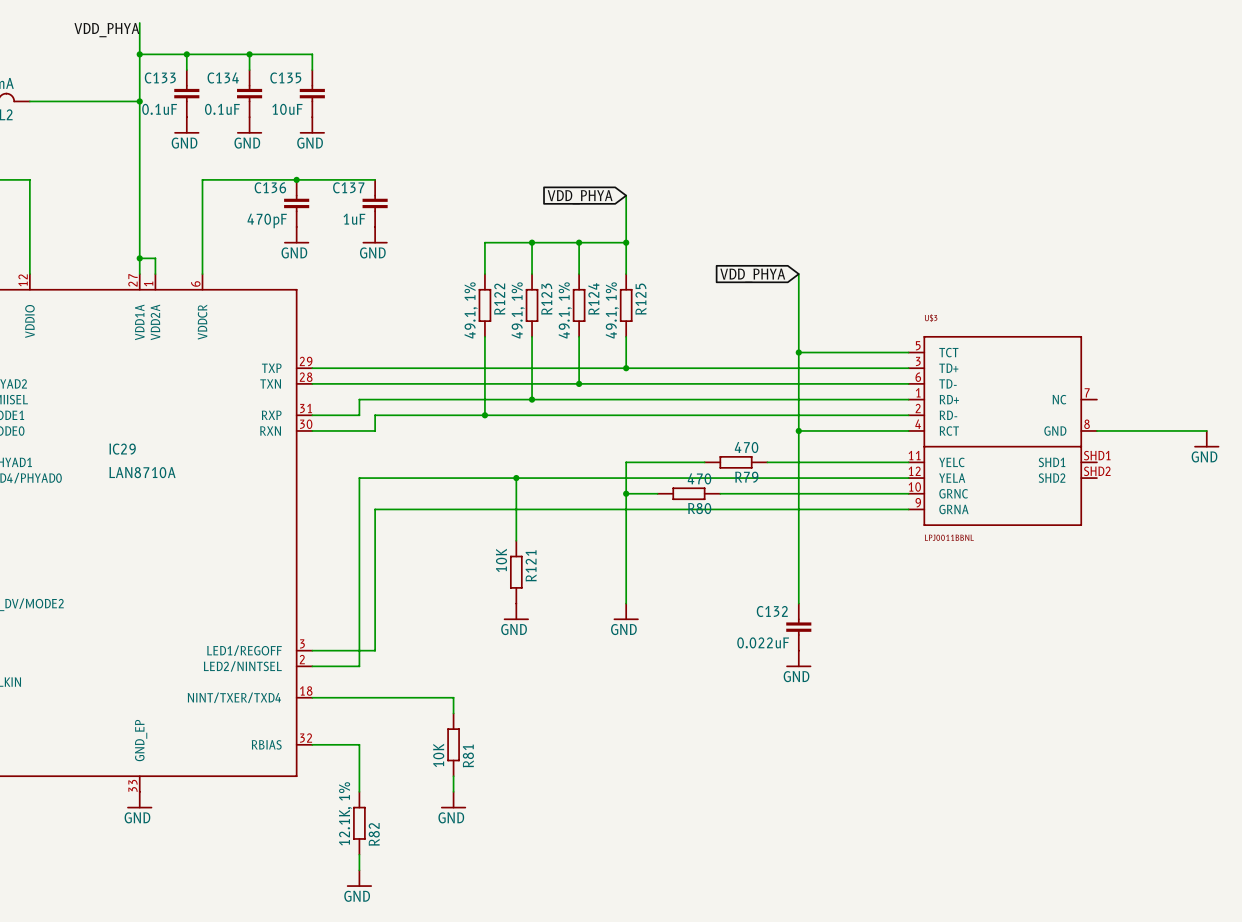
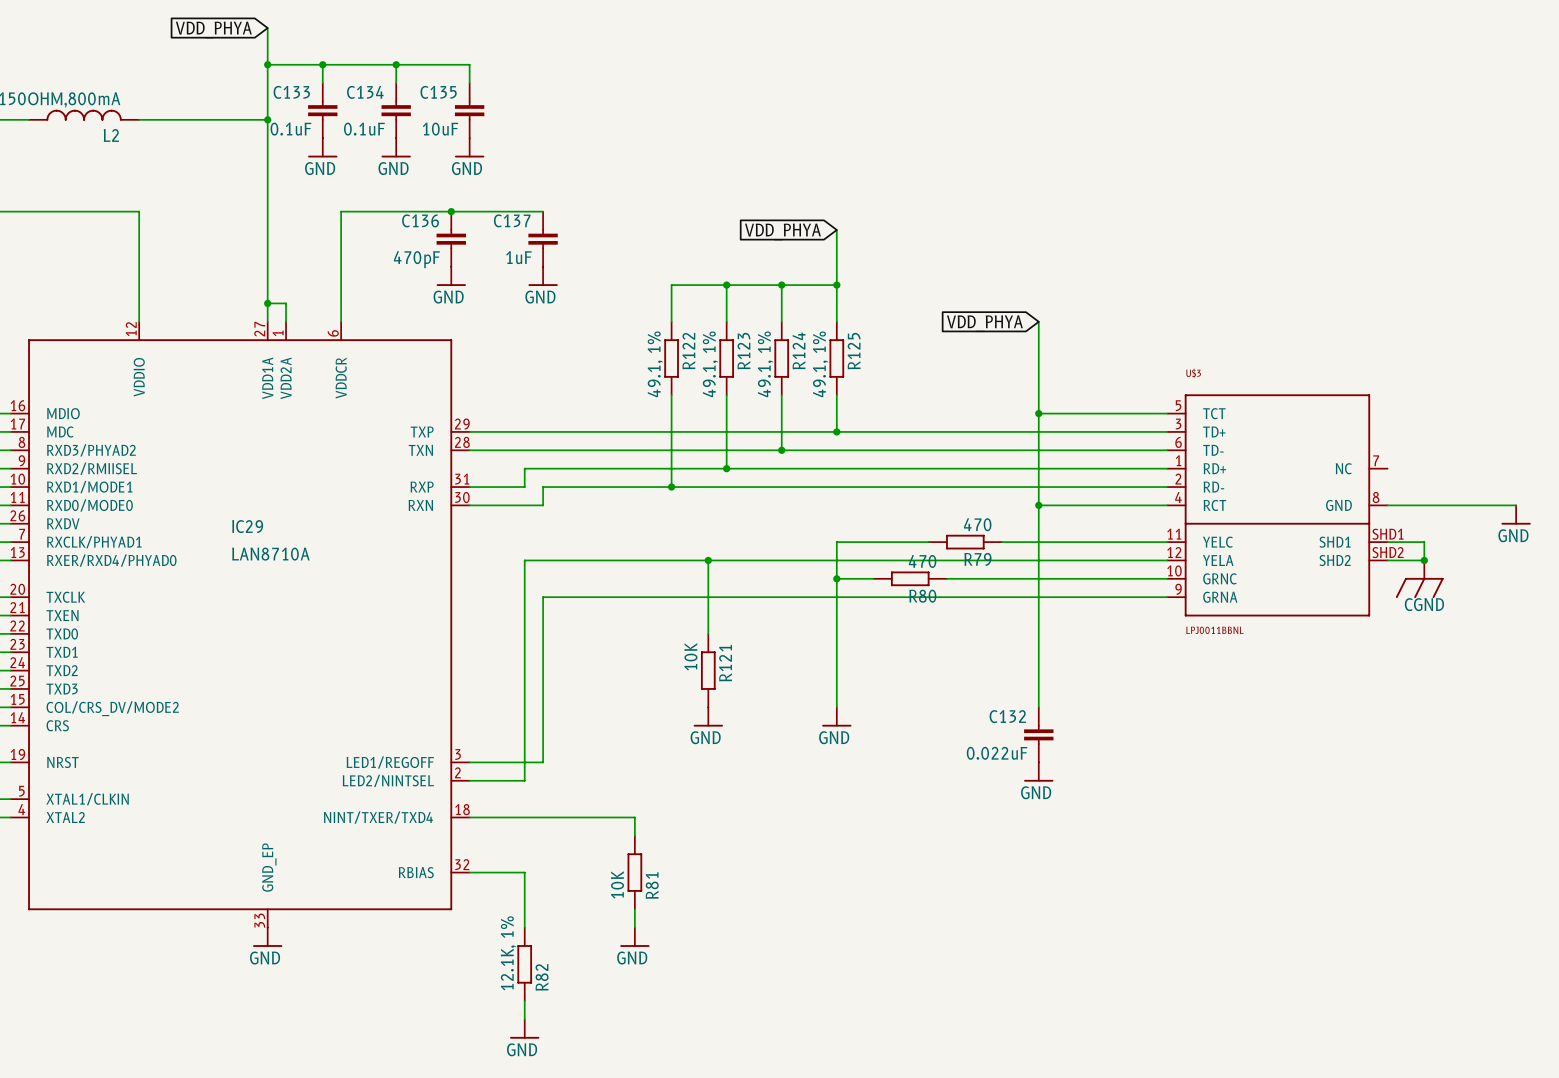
global label: none -> VDD_PHYA (213, 29)
label: VDD_PHYA (106, 30) -> none
wire: none -> (1387, 542) (1424, 542) (1424, 560) (1387, 560)
junction: none -> (1424, 560)
power symbol: none -> CGND (1419, 579)

